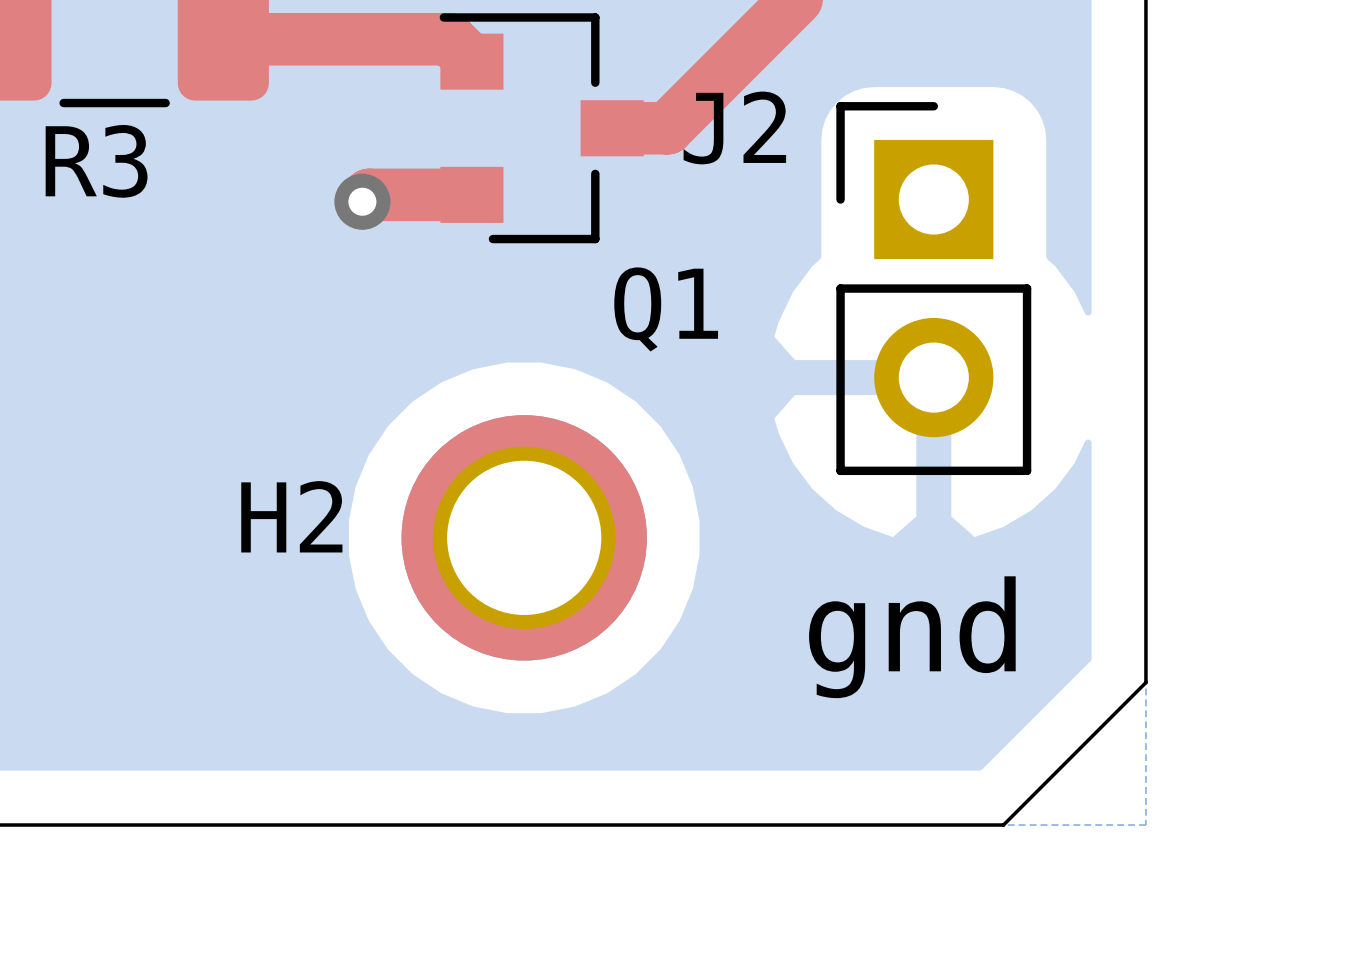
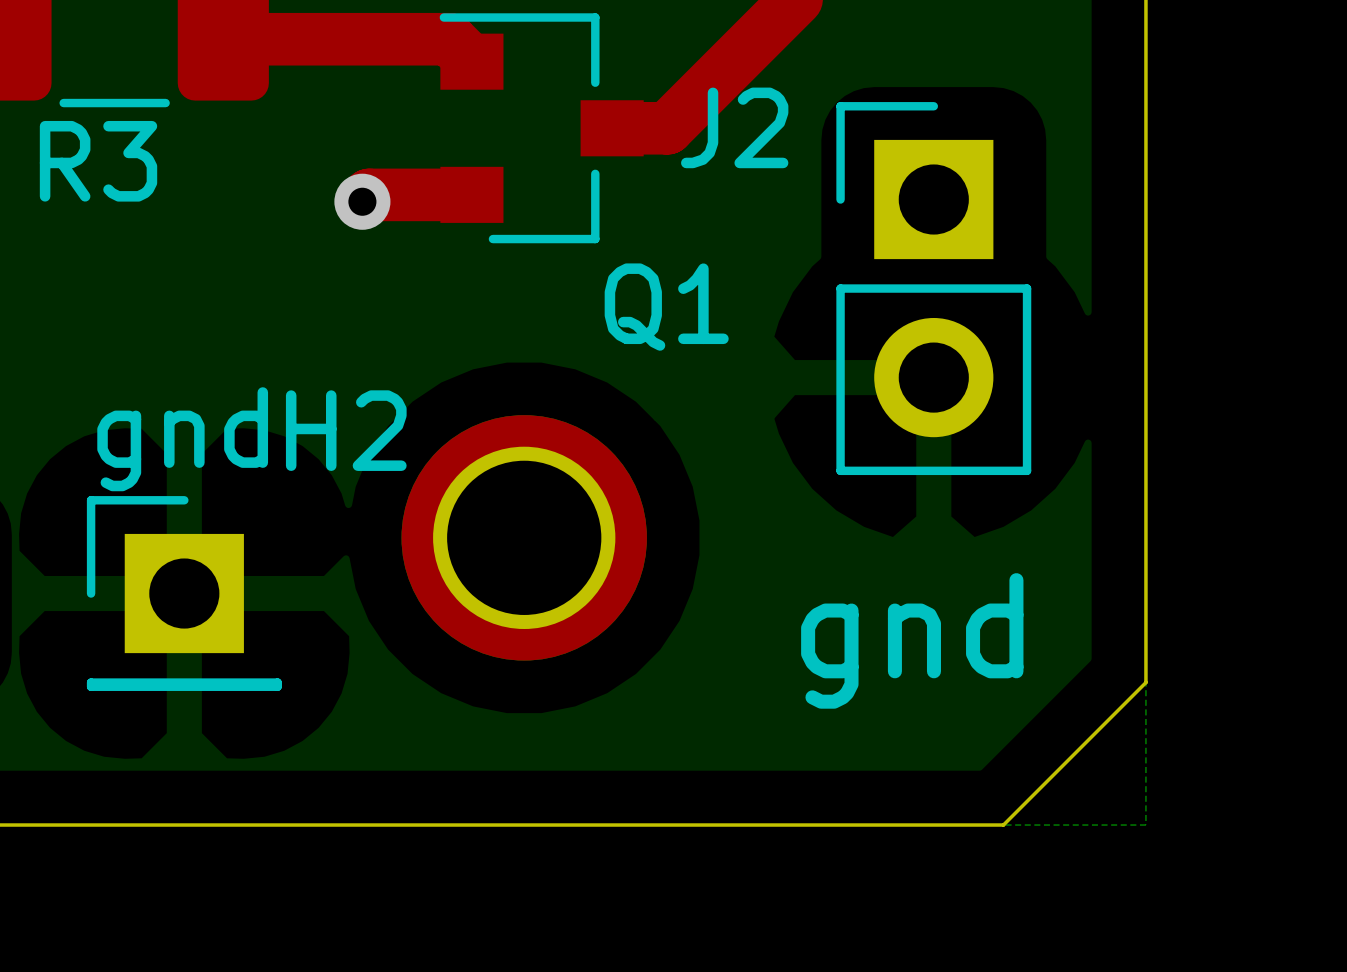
H2 name position: H2 (291, 516) -> H2 (346, 430)
gnd: none -> (184, 593)

